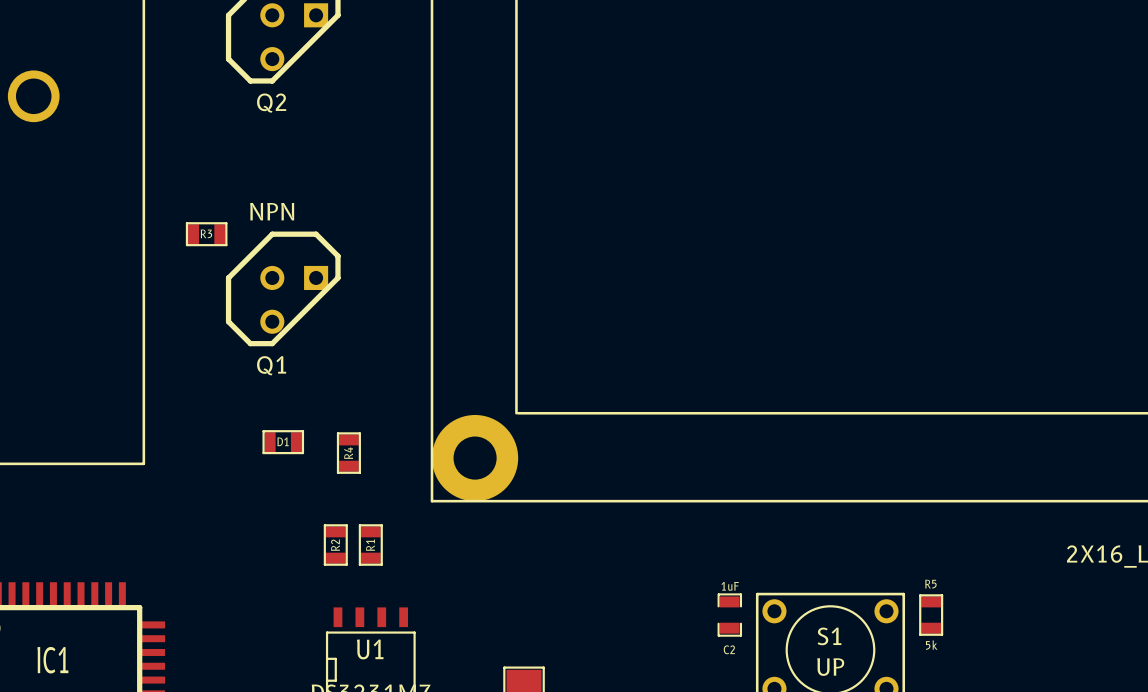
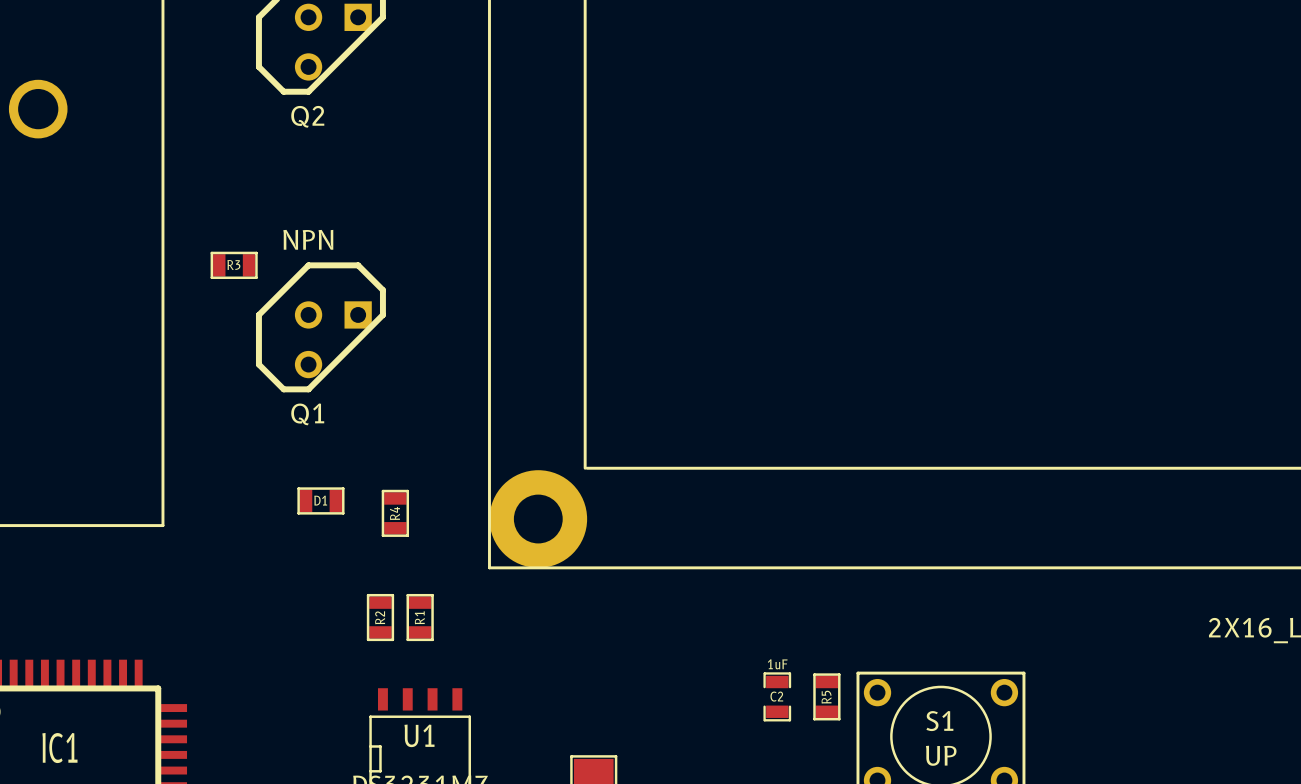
R5 name rotation: 0° (930, 584) -> 90° counterclockwise (826, 697)
R5 name position: R5 (930, 584) -> R5 (826, 697)
C2 position: (729, 615) -> (777, 696)
R5 position: (931, 615) -> (826, 696)
R5 value: 5k (931, 645) -> none
C2 name position: C2 (729, 649) -> C2 (776, 696)

